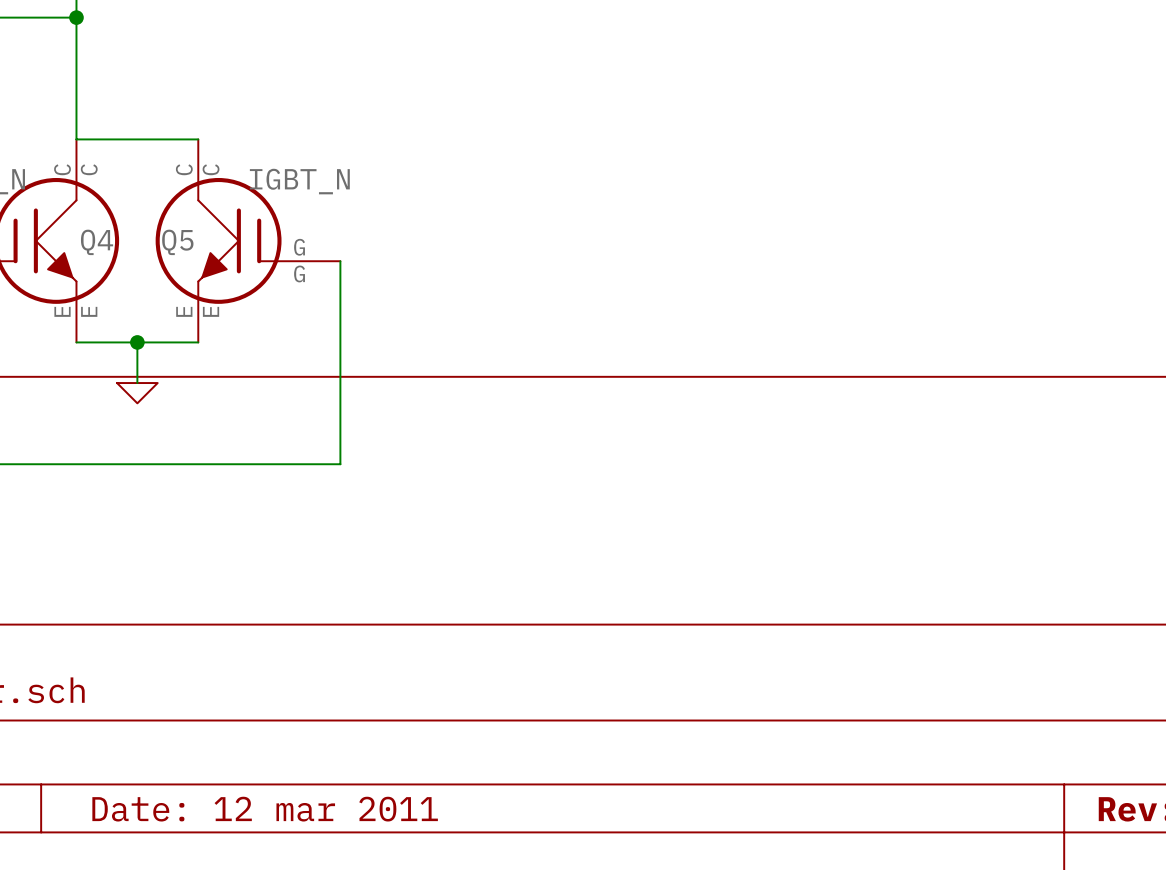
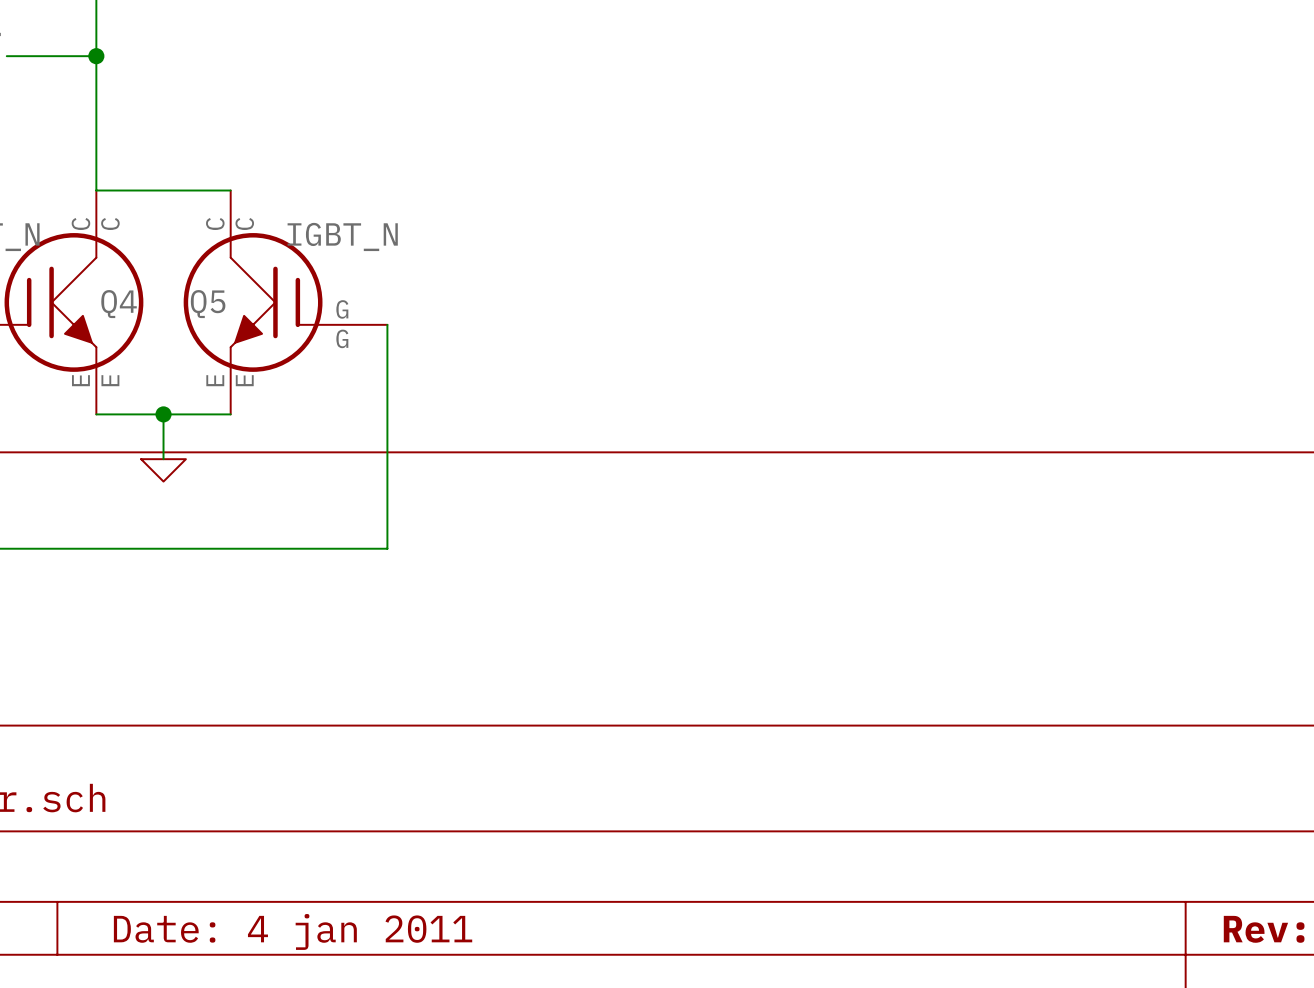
title block: Date: 12 mar 2011 (265, 809) -> Date: 4 jan 2011 (293, 931)

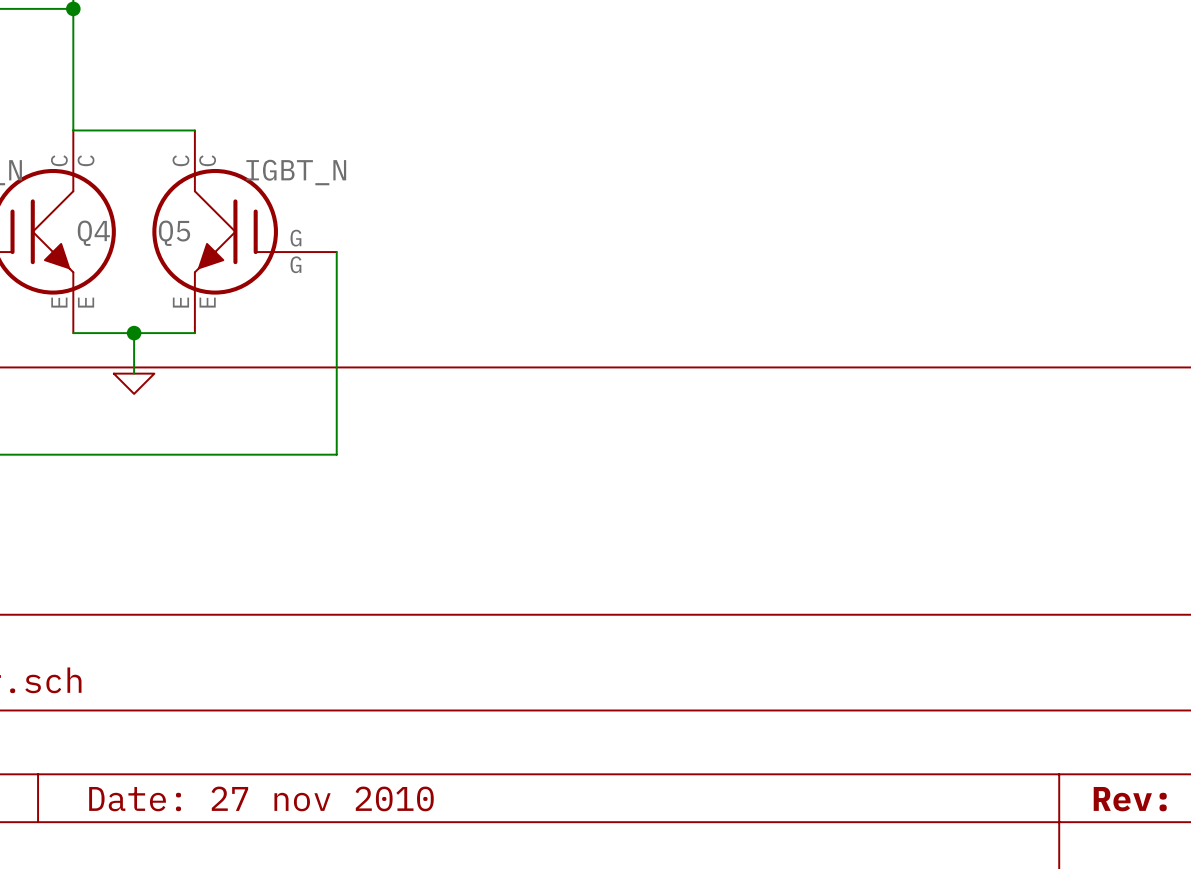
title block: Date: 4 jan 2011 (293, 931) -> Date: 27 nov 2010 (261, 798)

